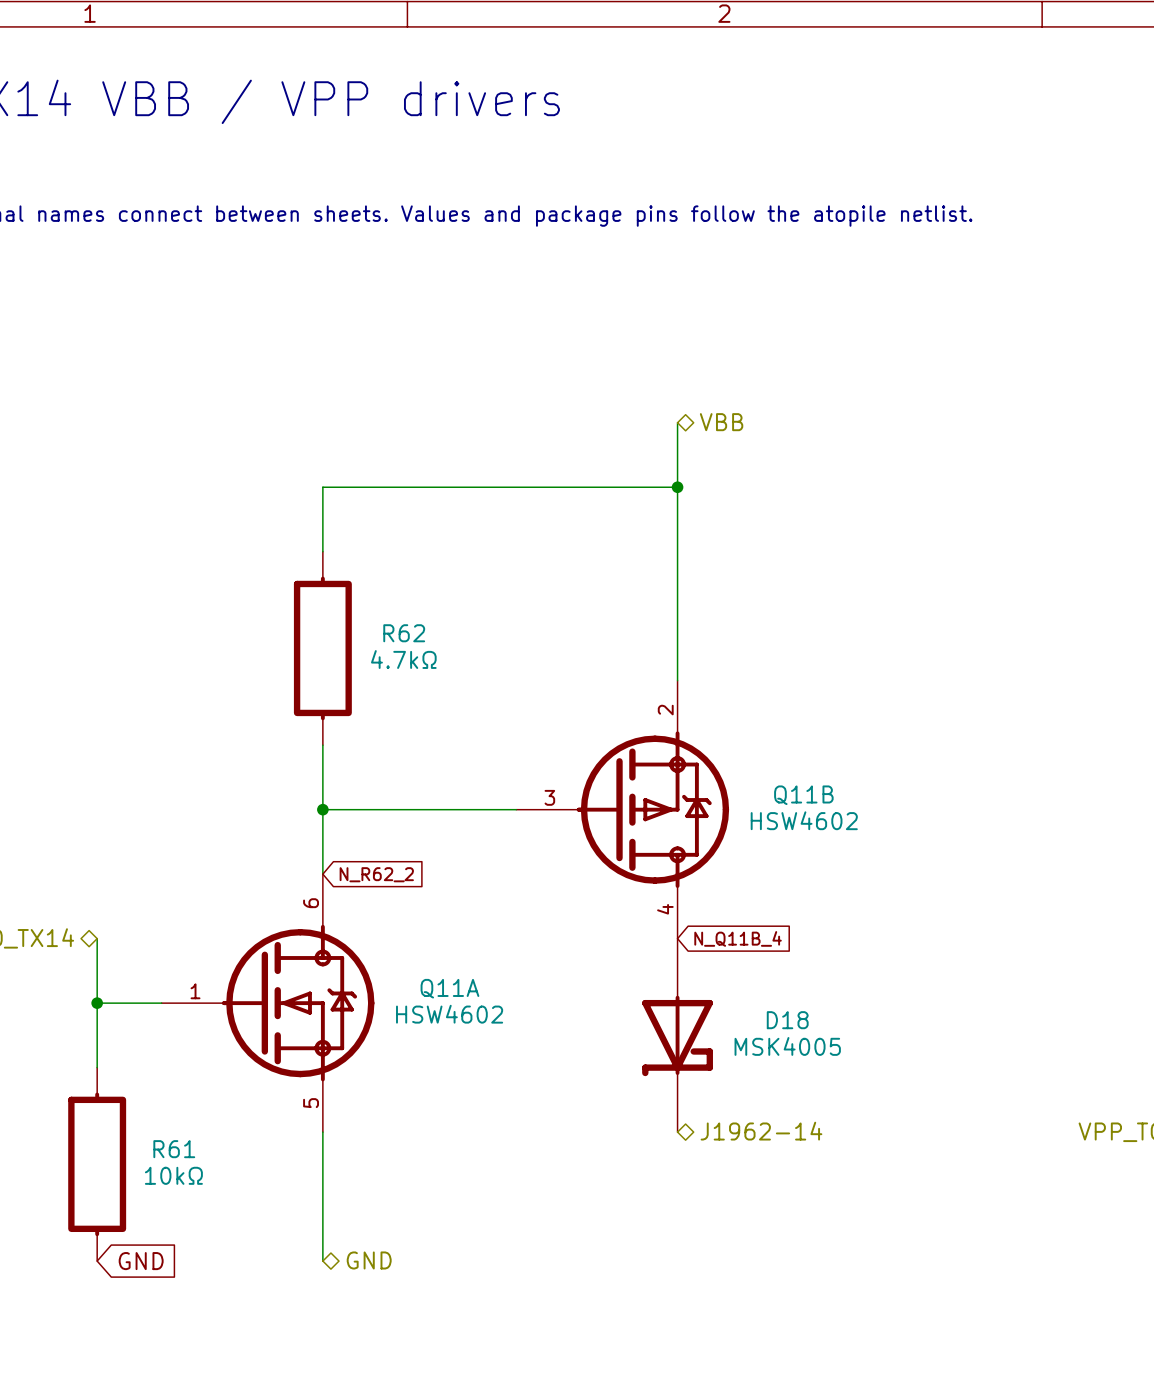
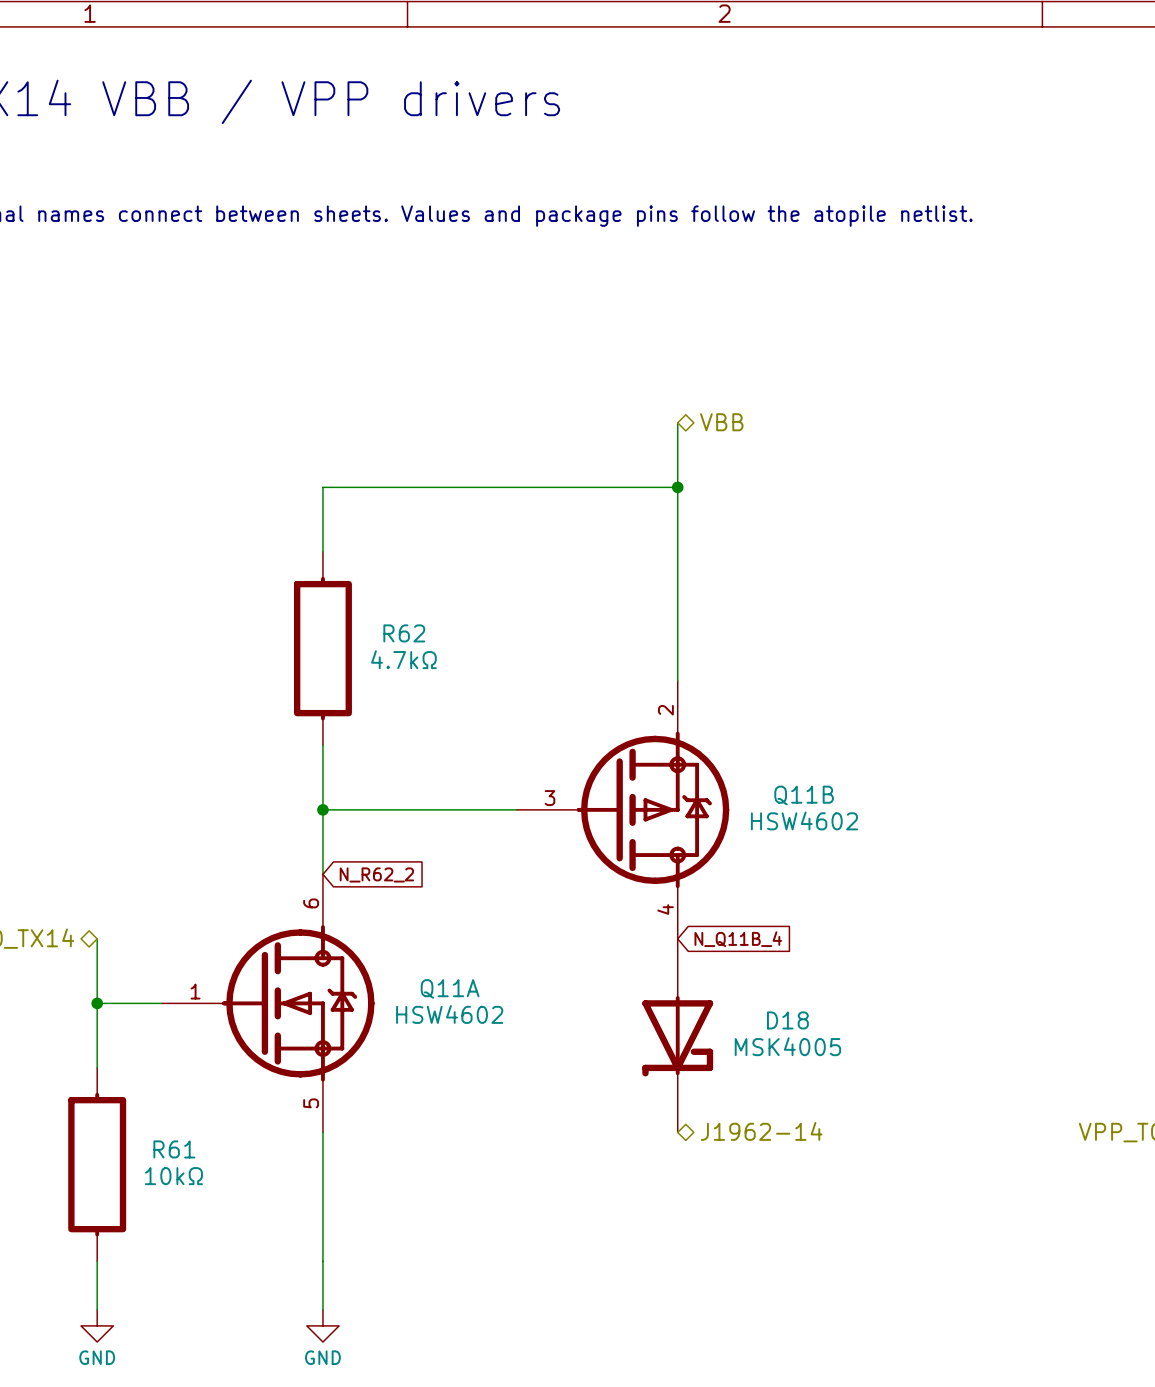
hierarchical label: GND (369, 1260) -> none
wire: none -> (97, 1261) (97, 1309)
global label: GND (141, 1261) -> none
wire: none -> (322, 1261) (322, 1309)
power symbol: none -> GND (97, 1325)
power symbol: none -> GND (322, 1325)

